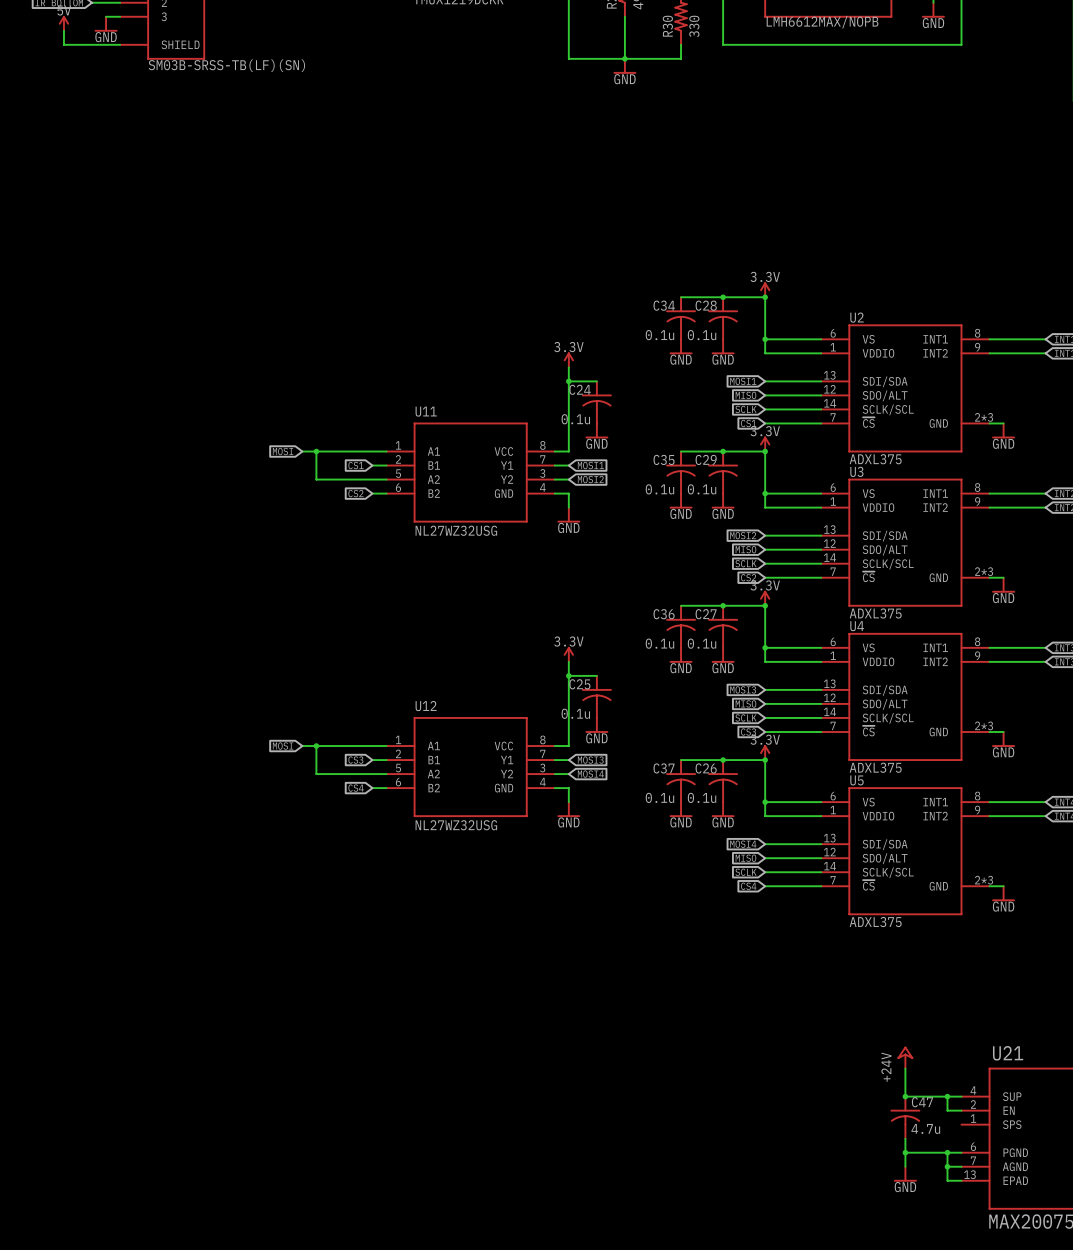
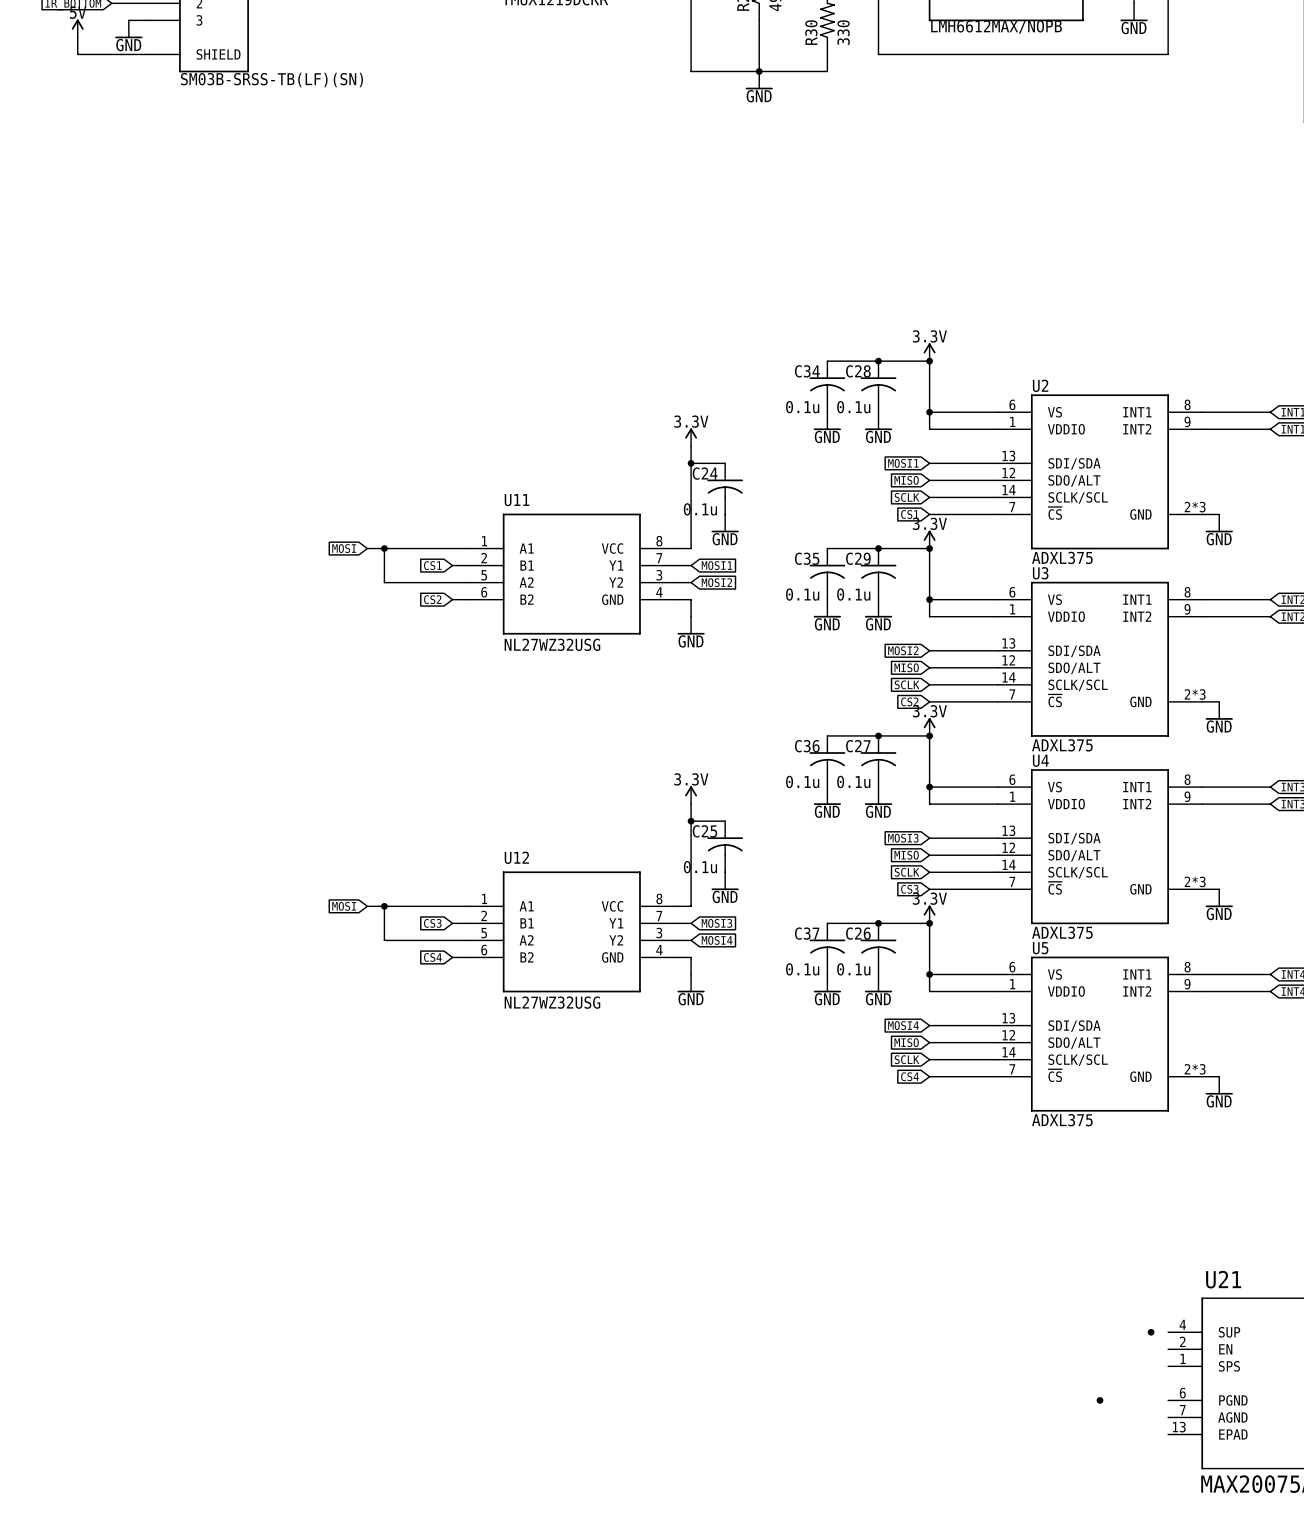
power symbol: +24V (905, 1057) -> none
wire: (905, 1068) (905, 1096) (961, 1096) -> none
junction: (905, 1096) -> none
wire: (947, 1096) (947, 1110) (961, 1110) -> none
C47: 4.7u (905, 1117) -> none
wire: (905, 1138) (905, 1166) -> none
wire: (905, 1152) (961, 1152) -> none
wire: (947, 1152) (947, 1180) (961, 1180) -> none
junction: (947, 1152) -> none
wire: (947, 1166) (961, 1166) -> none
junction: (947, 1166) -> none
power symbol: GND (905, 1174) -> none

